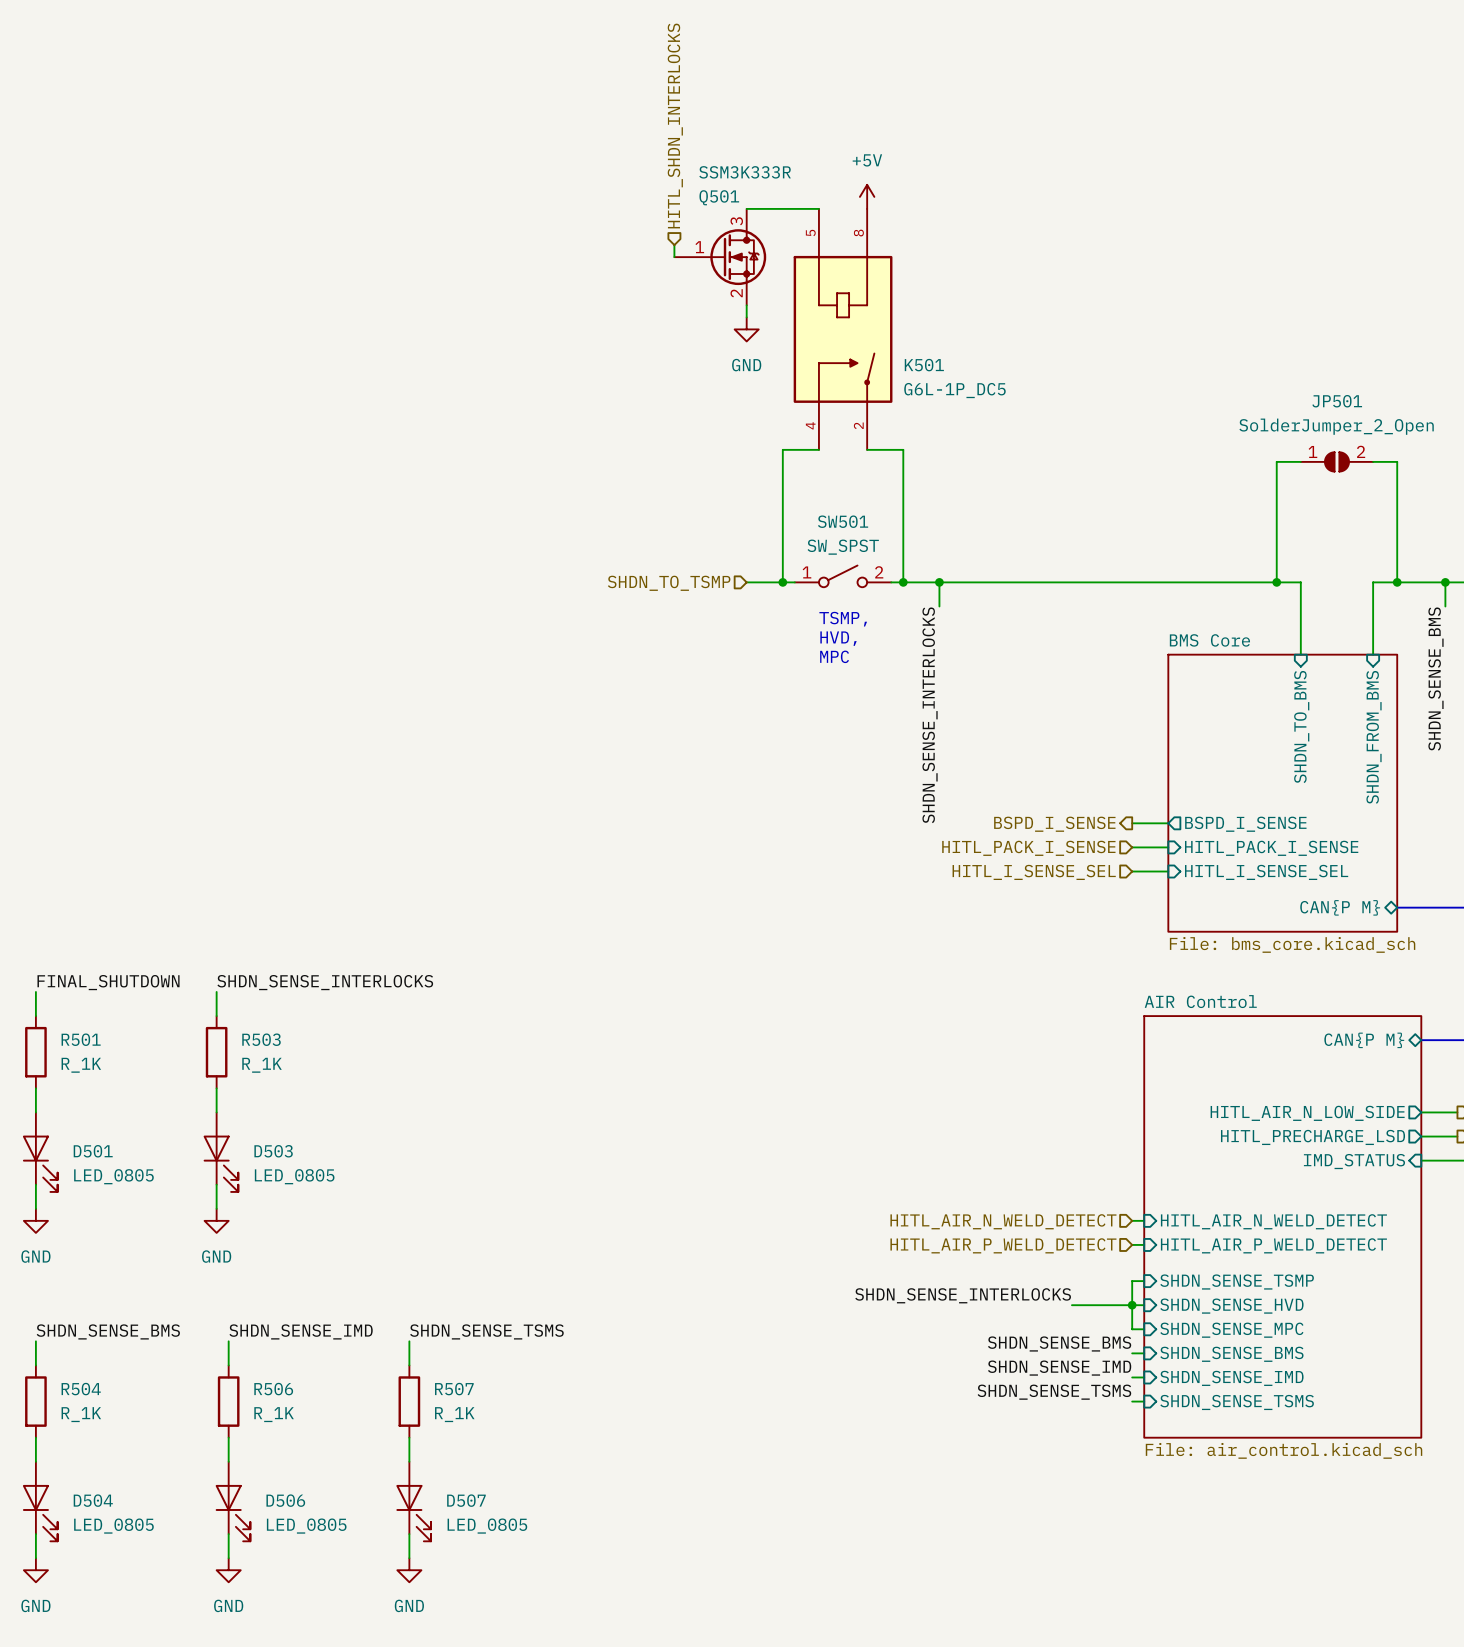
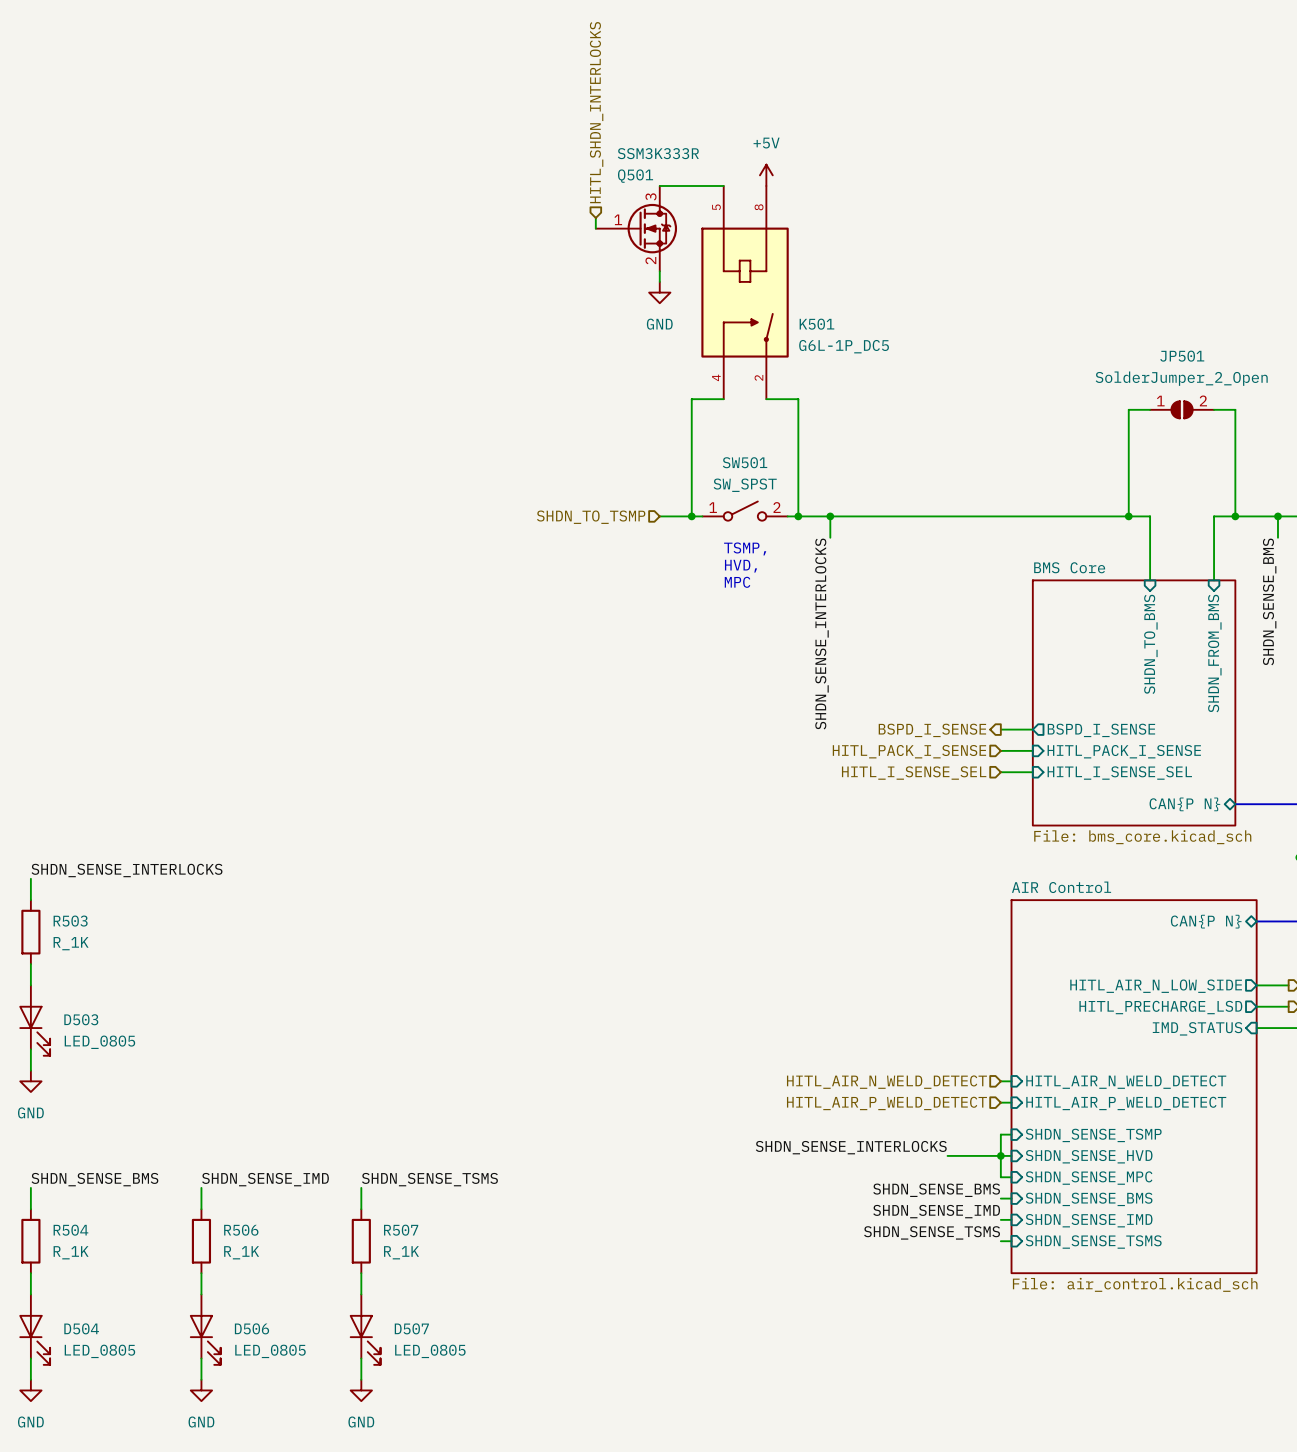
sheet pin: CAN{P M} (1340, 907) -> CAN{P N} (1184, 804)
label: FINAL_SHUTDOWN (108, 982) -> SHDN_SENSE_INTERLOCKS (127, 870)
label: SHDN_SENSE_INTERLOCKS (325, 982) -> none
wire: (216, 991) (216, 1016) -> none
R501 name: R501 (81, 1039) -> R503 (70, 921)
sheet pin: CAN{P M} (1364, 1040) -> CAN{P N} (1206, 921)
R503: R_1K (216, 1052) -> none
wire: (216, 1088) (216, 1112) -> none
D501 name: D501 (93, 1151) -> D503 (81, 1019)
D503: LED_0805 (220, 1152) -> none
wire: (216, 1184) (216, 1208) -> none
power symbol: GND (216, 1220) -> none

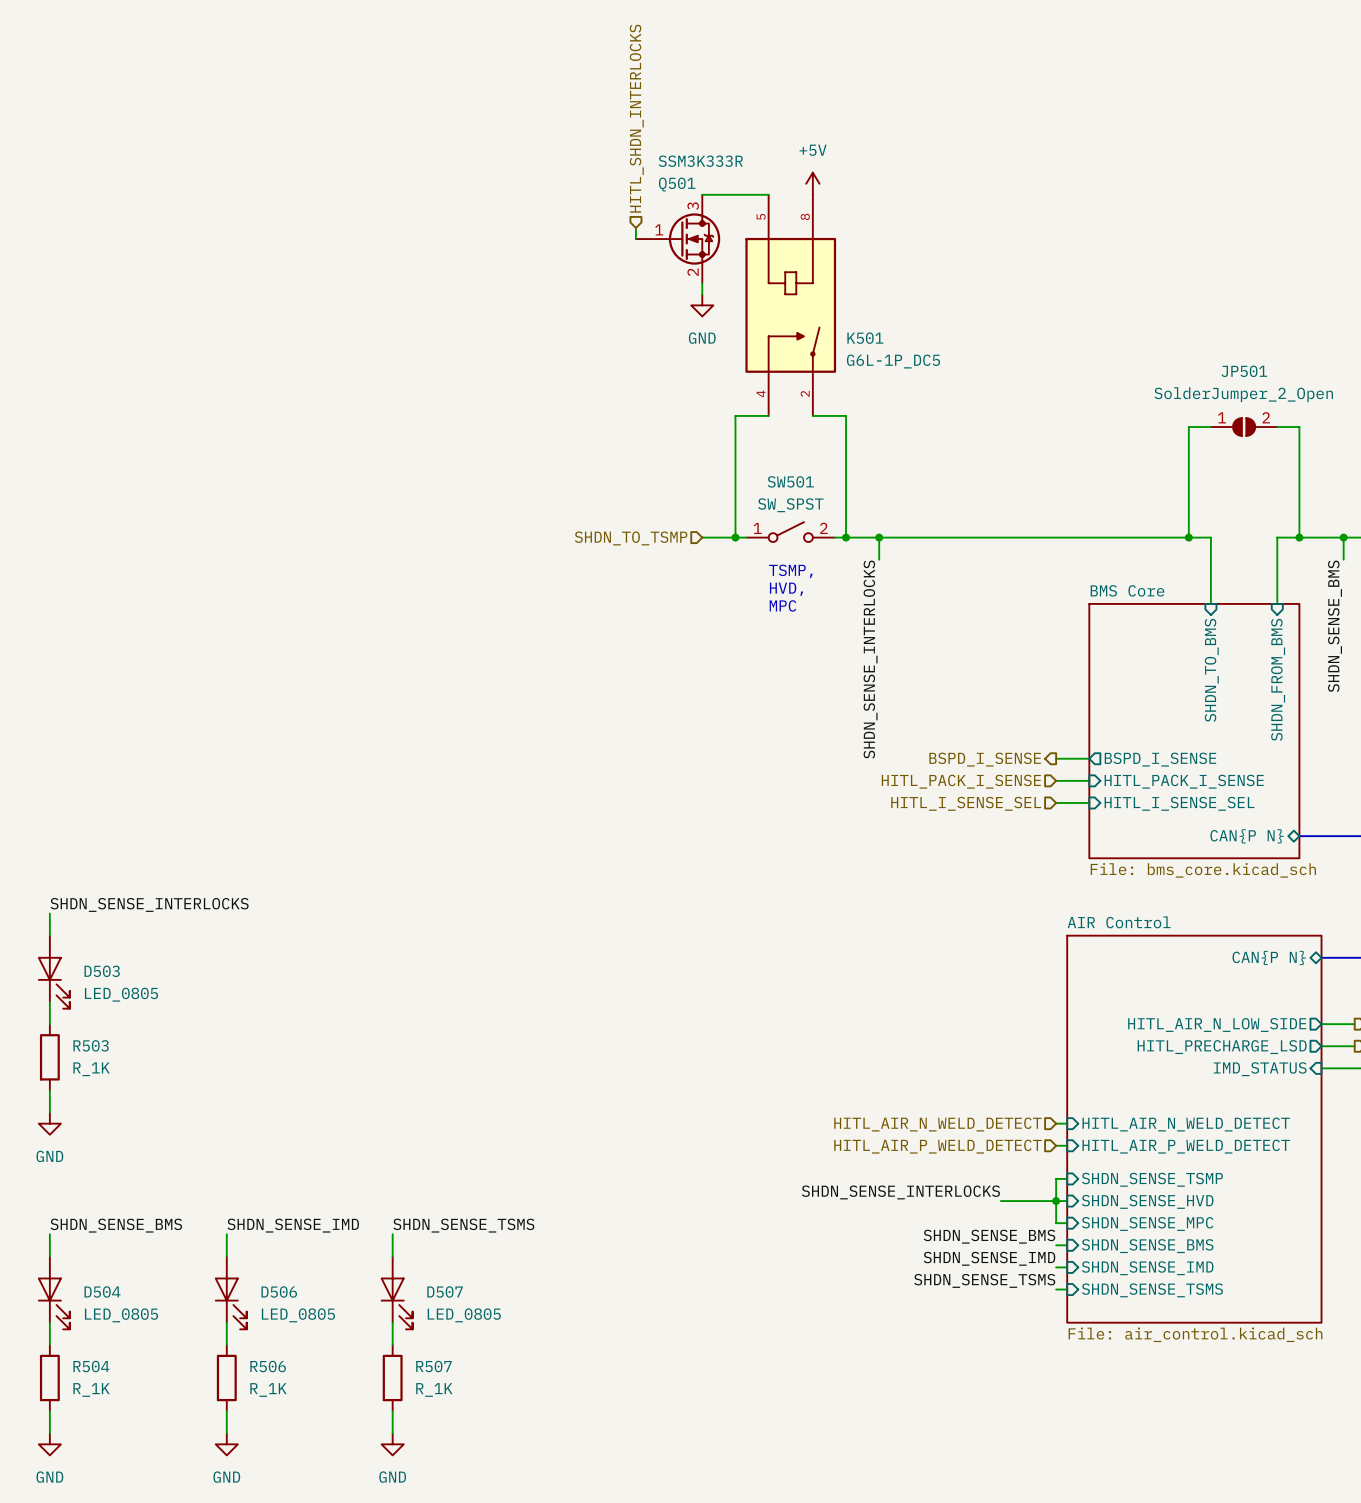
R503 position: (30, 932) -> (49, 1057)
D503 position: (34, 1020) -> (53, 972)
R504 position: (30, 1241) -> (49, 1377)
R506 position: (201, 1241) -> (226, 1377)
R507 position: (361, 1241) -> (392, 1377)
D504 position: (34, 1329) -> (53, 1292)
D506 position: (205, 1329) -> (230, 1292)
D507 position: (365, 1329) -> (396, 1292)

